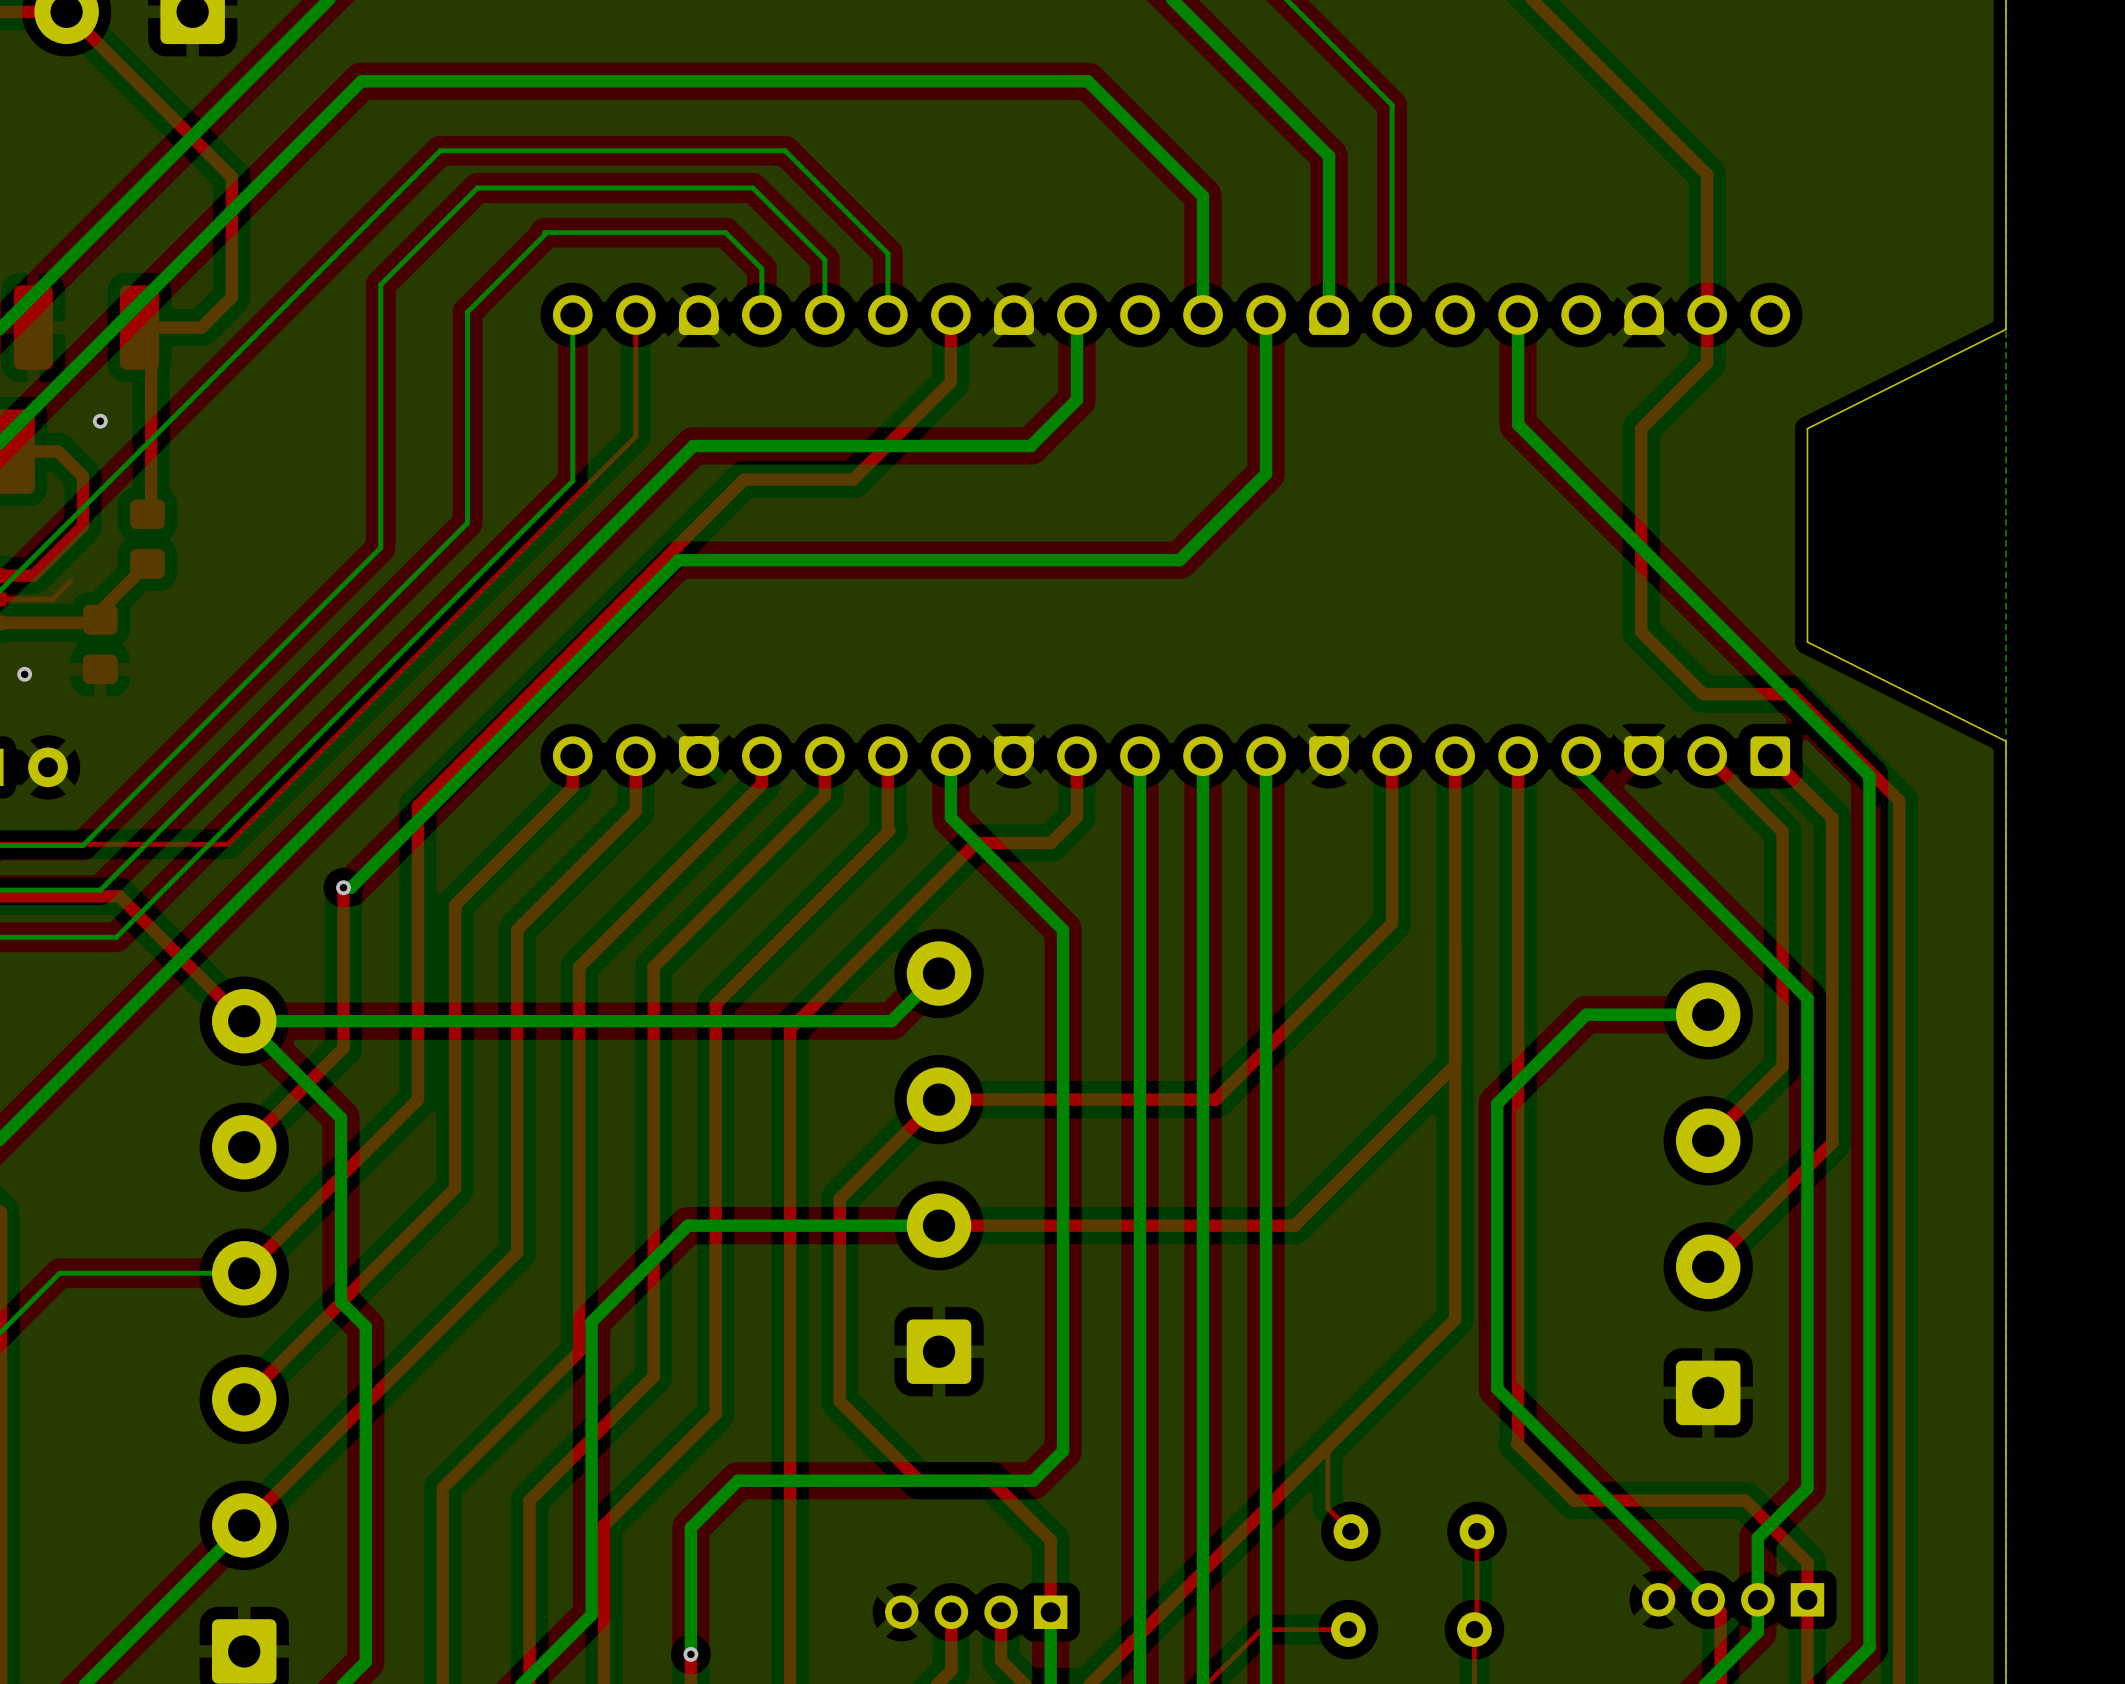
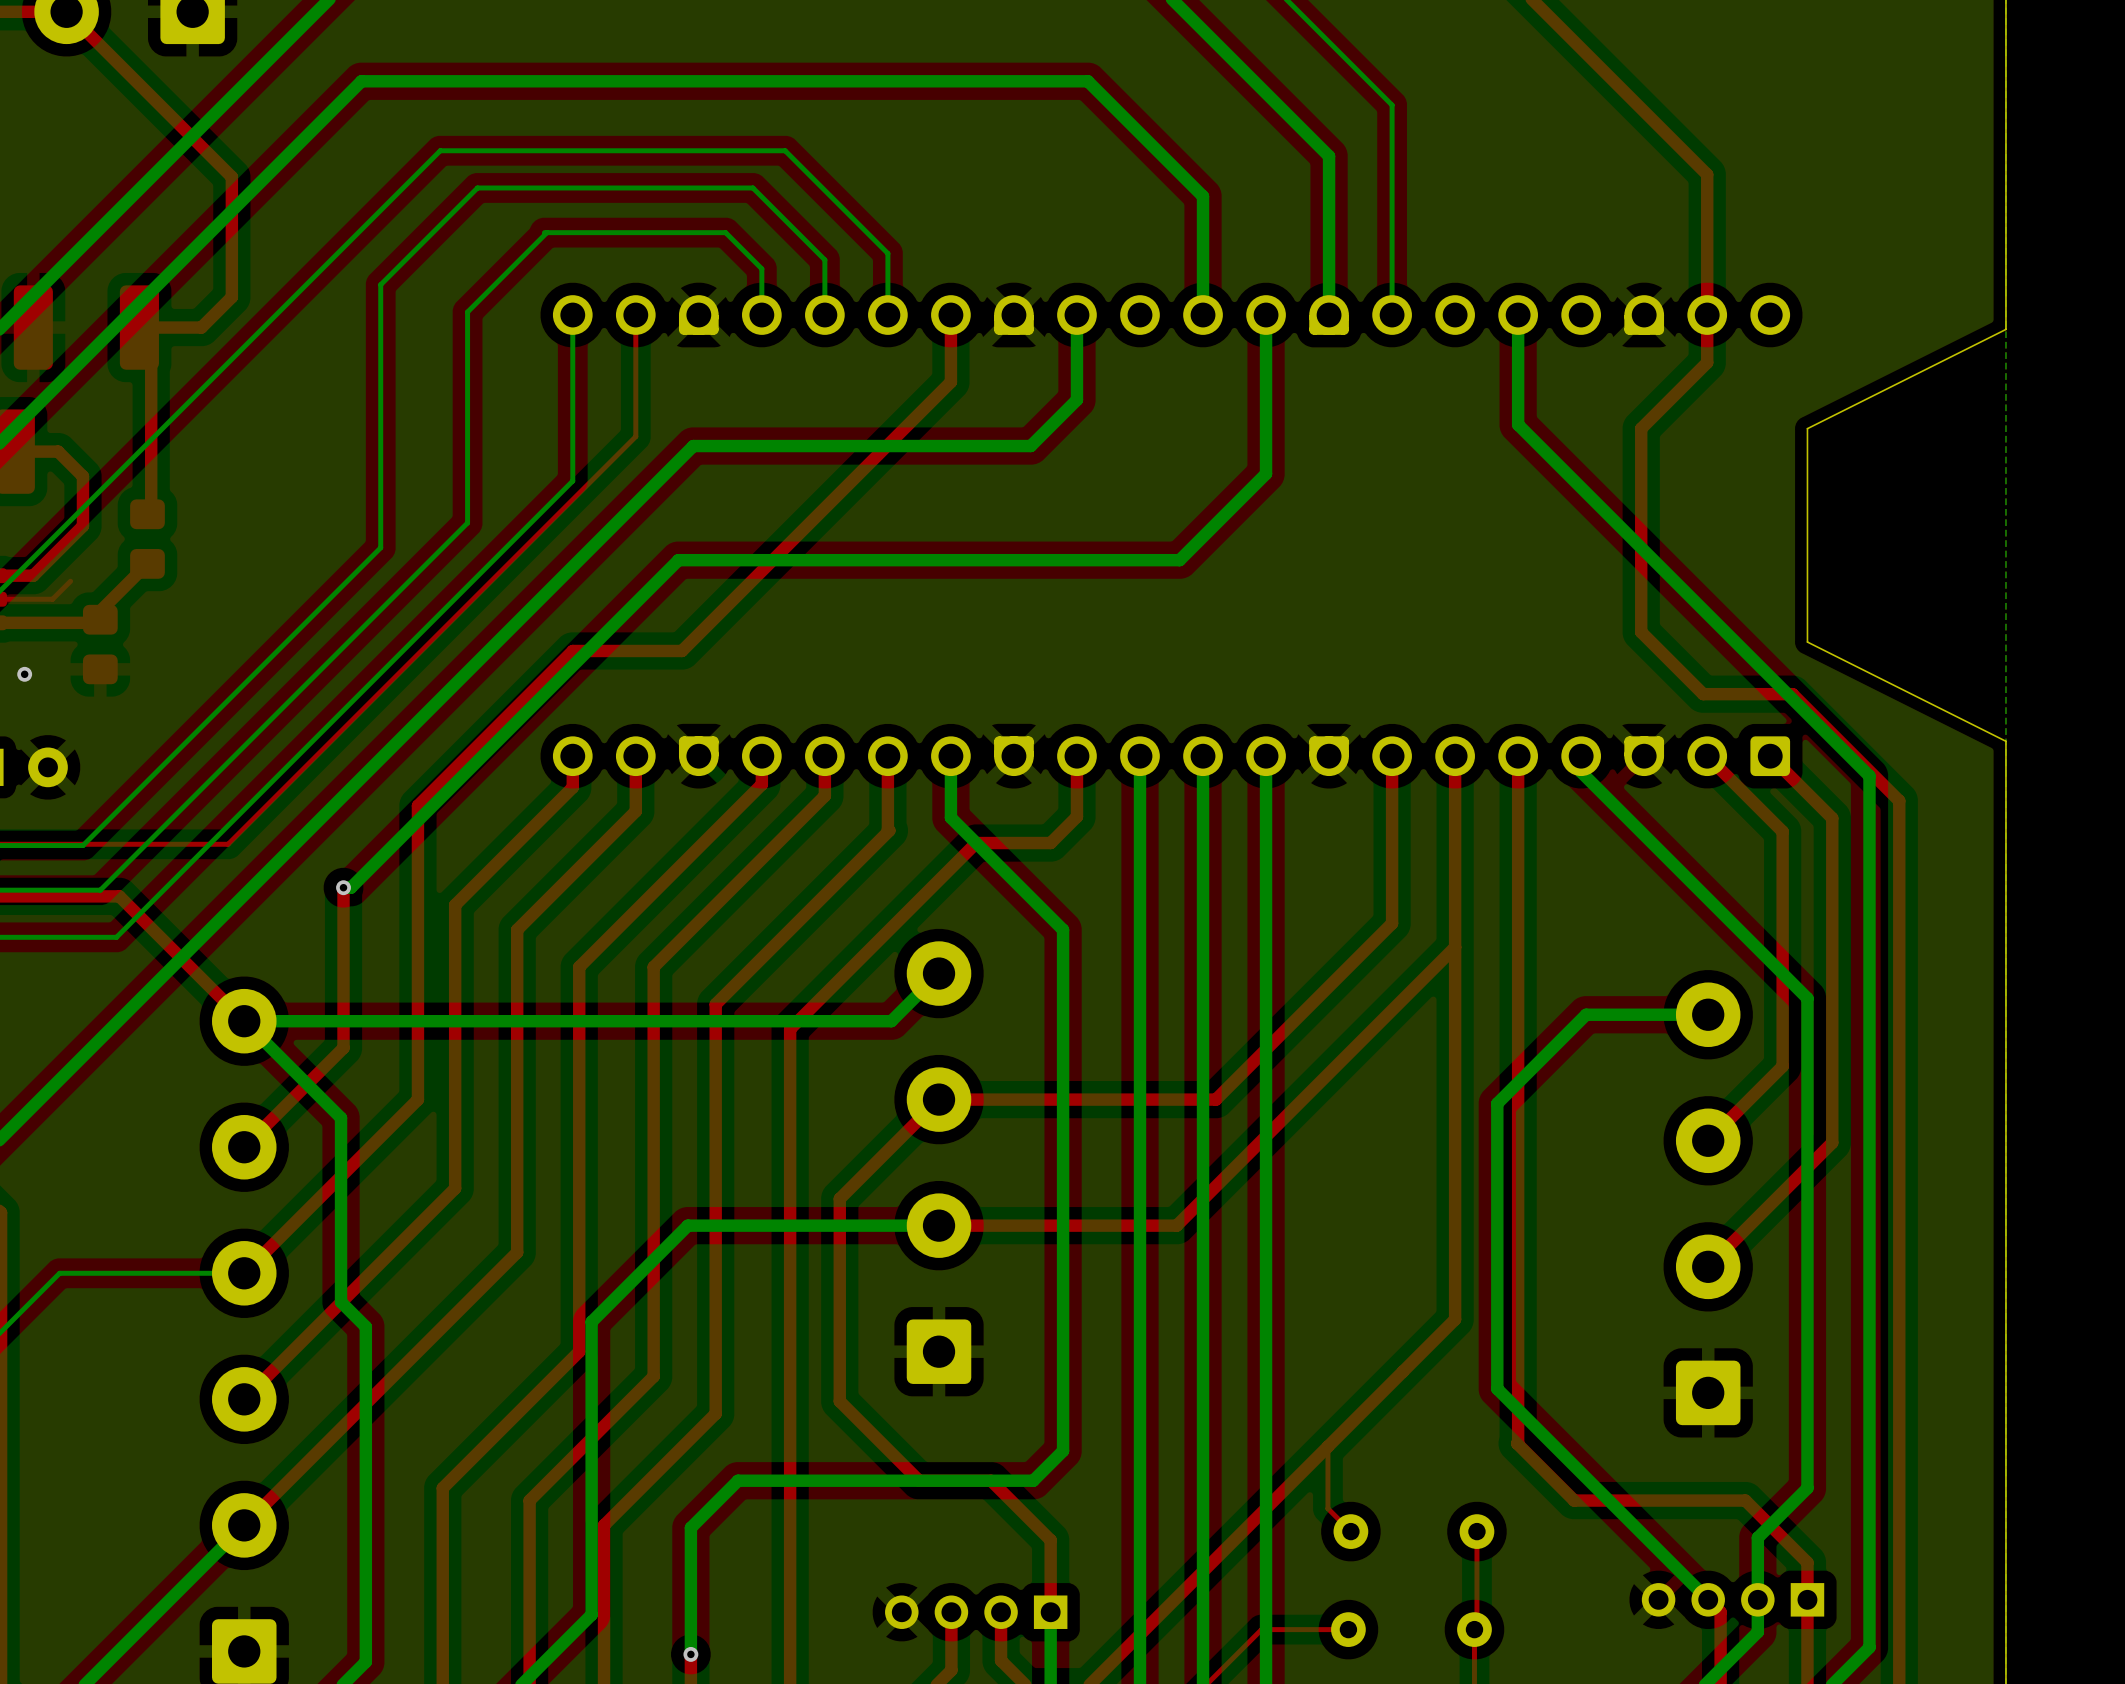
via: (100, 421) -> none
top track: (853, 479) (744, 479) (572, 650) -> (853, 479) (681, 650) (572, 650)
top track: (1455, 1065) (1294, 1225) (1176, 1225) -> (1455, 947) (1176, 1225)

